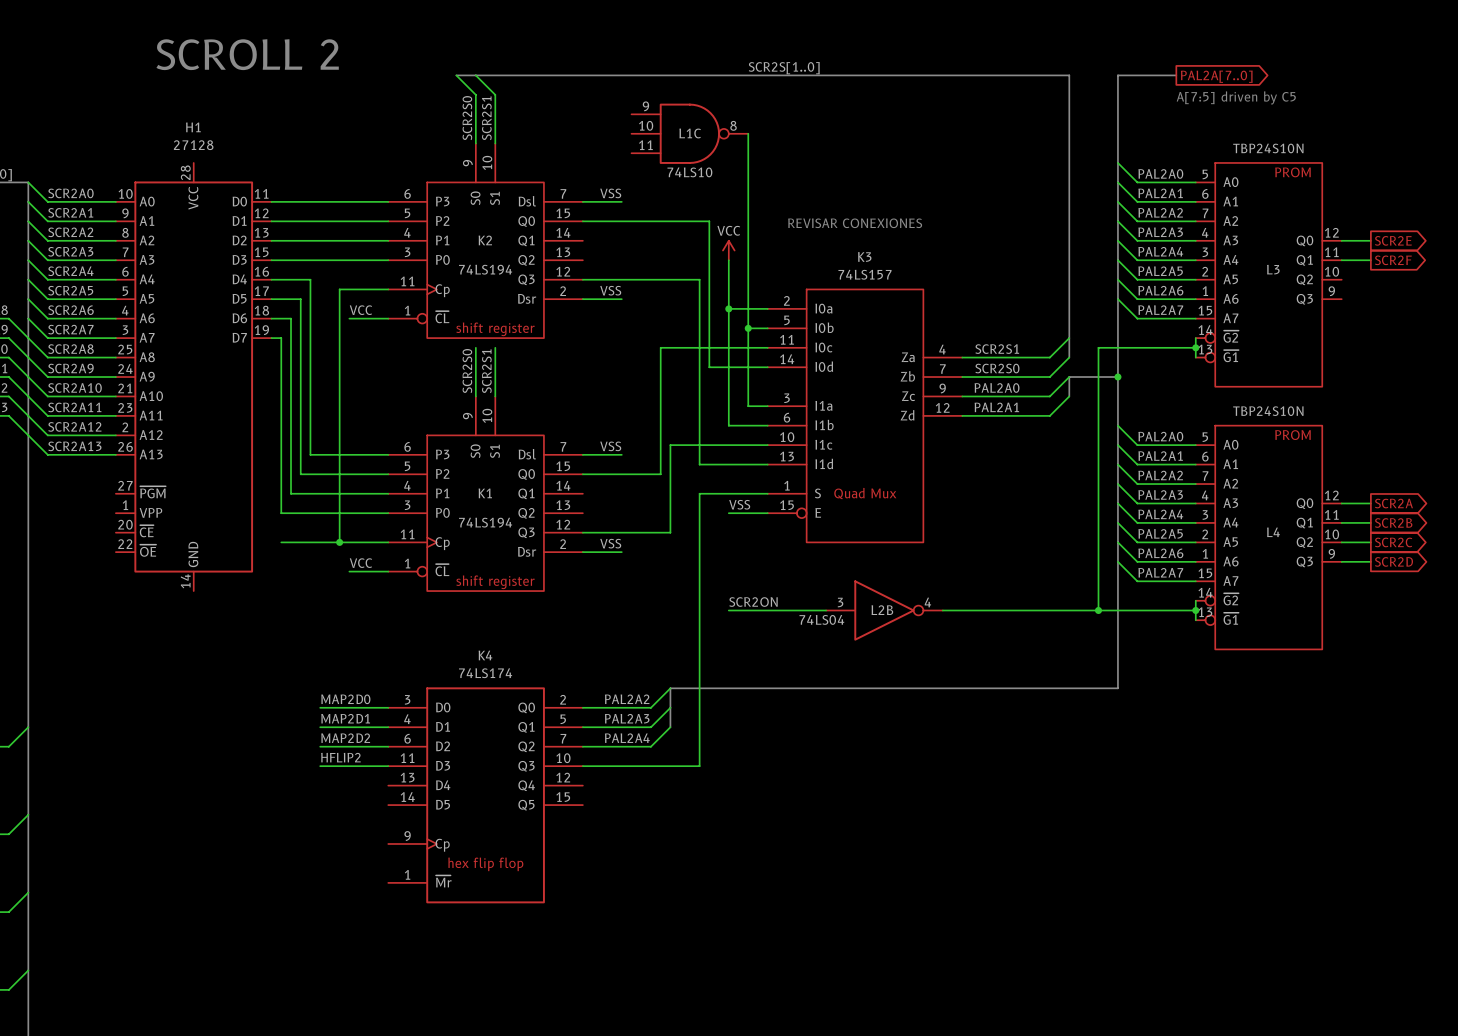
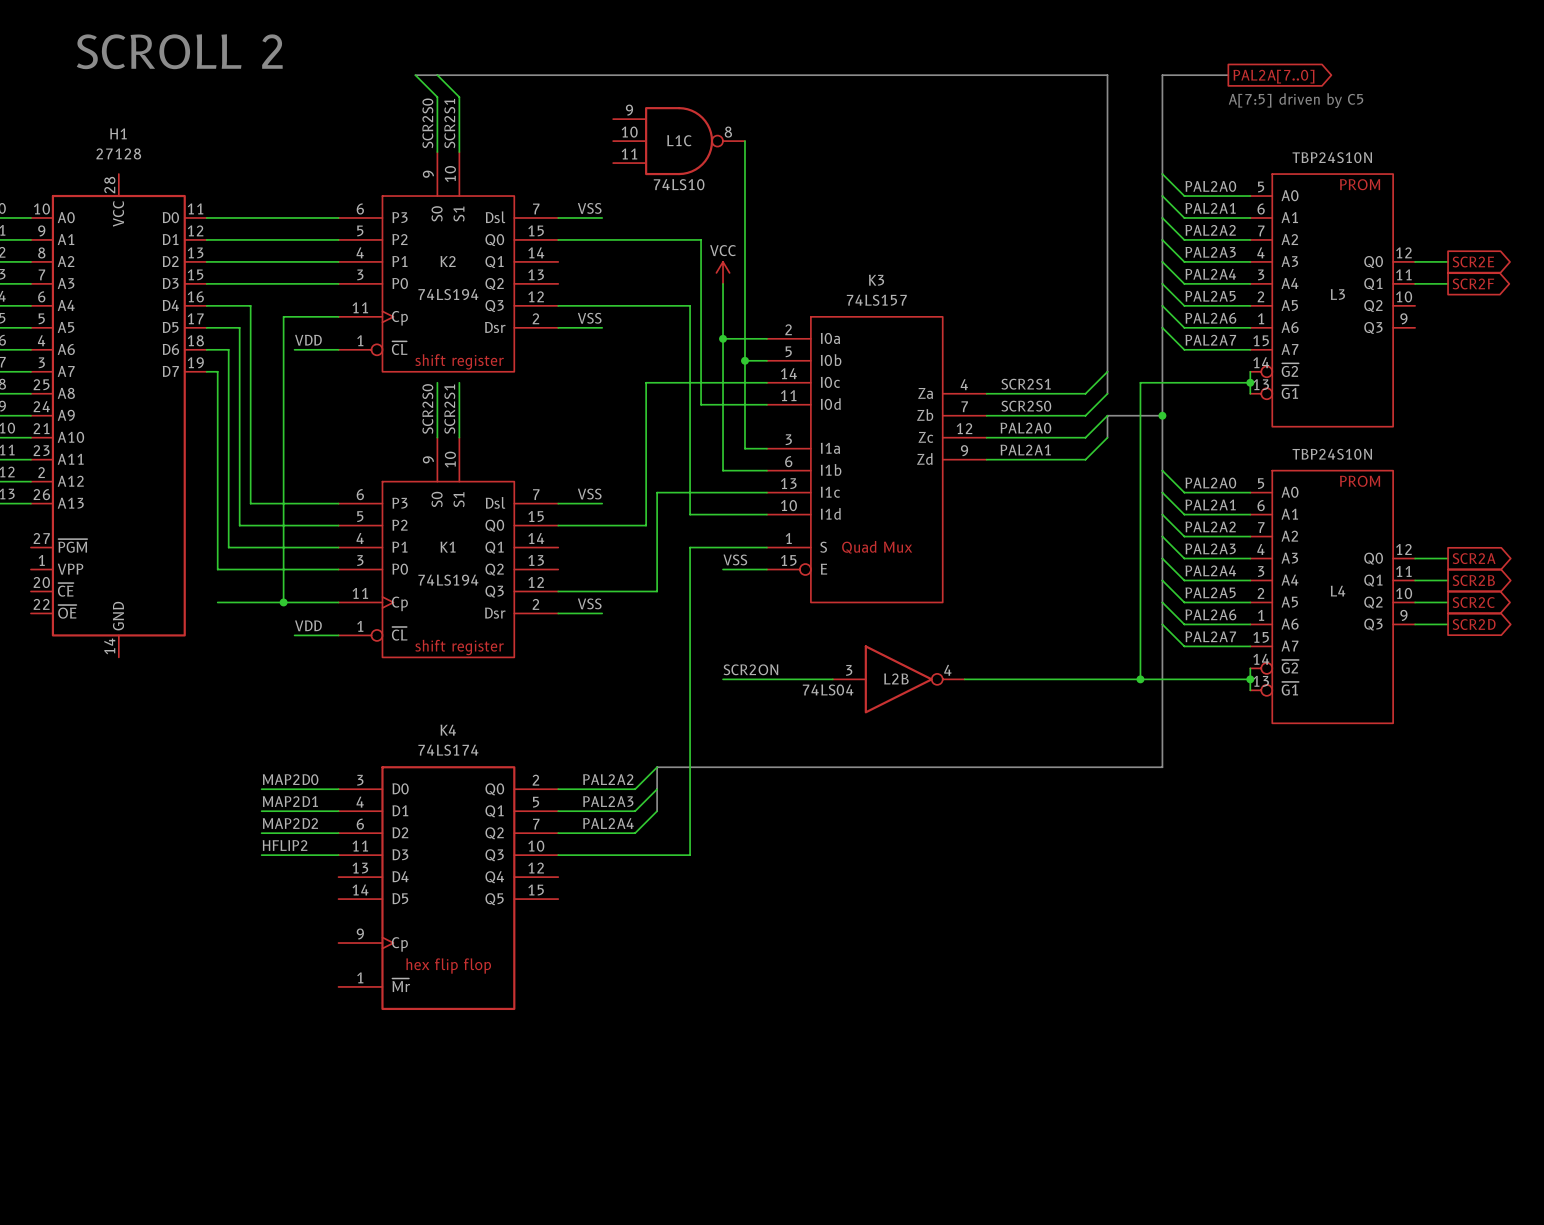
label: SCR2S[1..0] (784, 68) -> none
text: REVISAR CONEXIONES (855, 223) -> none
label: VCC (360, 310) -> VDD (308, 340)
K3 pin number: 11 (787, 339) -> 14 (788, 373)
K3 pin number: 14 (787, 359) -> 11 (788, 395)
K3 pin number: 9 (942, 388) -> 12 (964, 428)
K3 pin number: 12 (942, 407) -> 9 (964, 450)
K3 pin number: 10 (787, 437) -> 13 (788, 483)
K3 pin number: 13 (787, 456) -> 10 (788, 505)
label: VCC (360, 563) -> VDD (308, 625)

